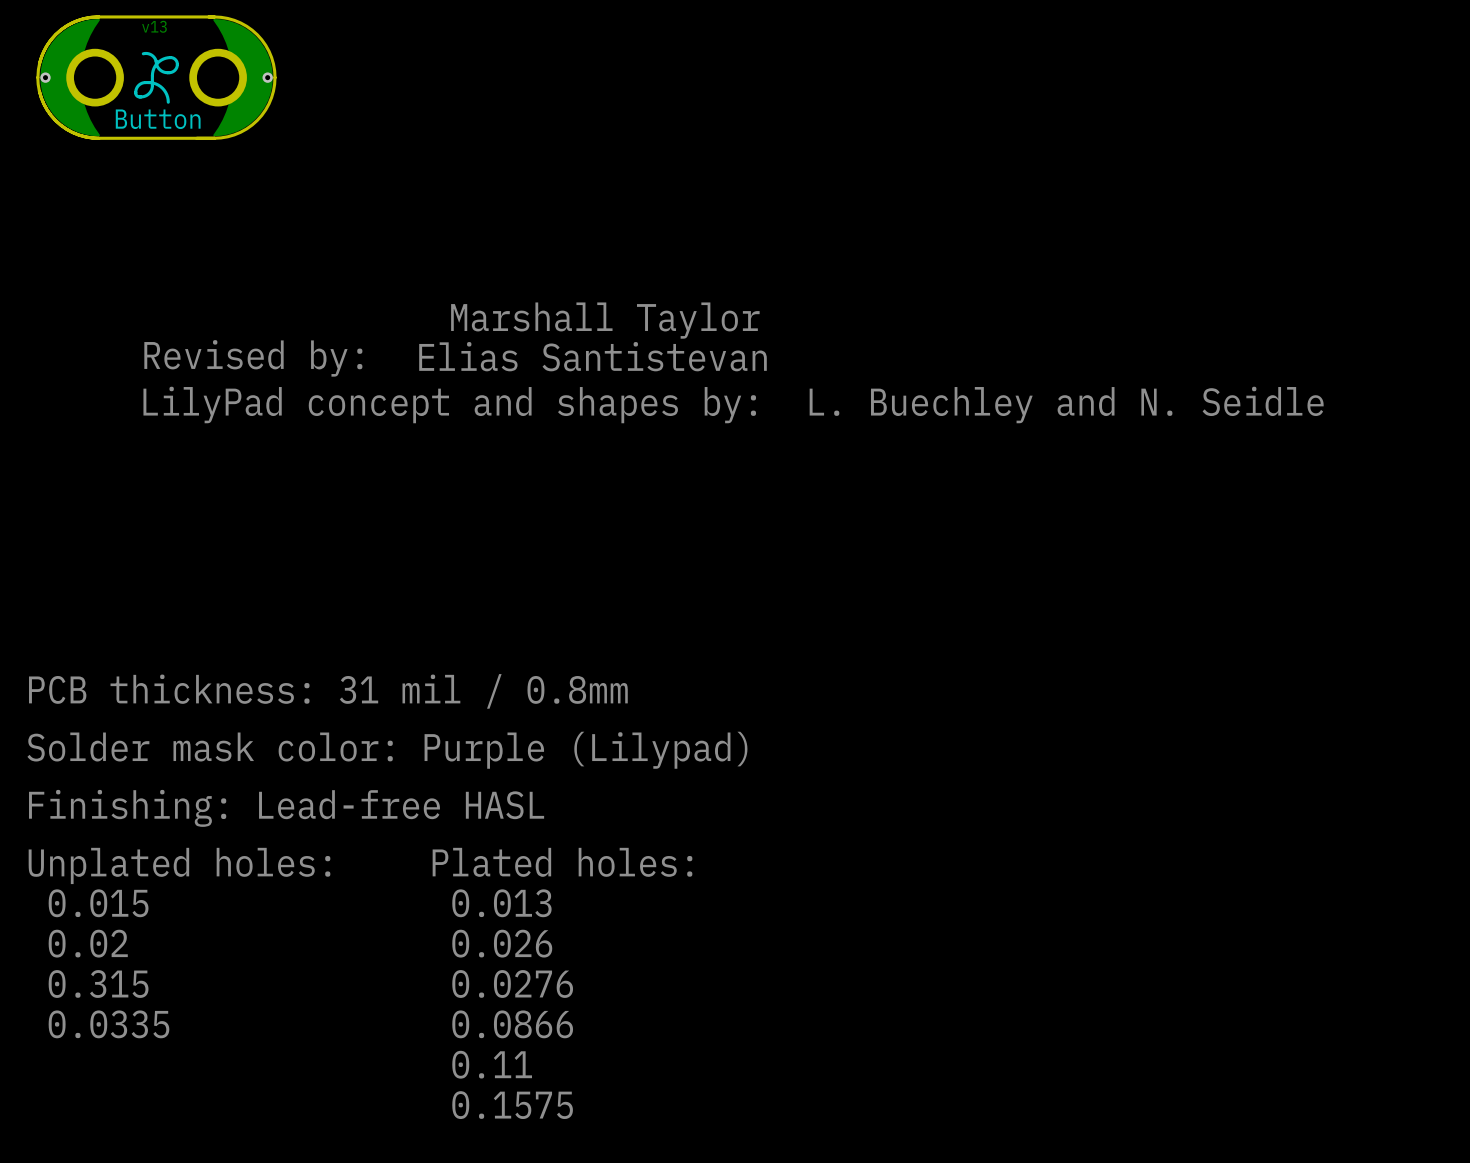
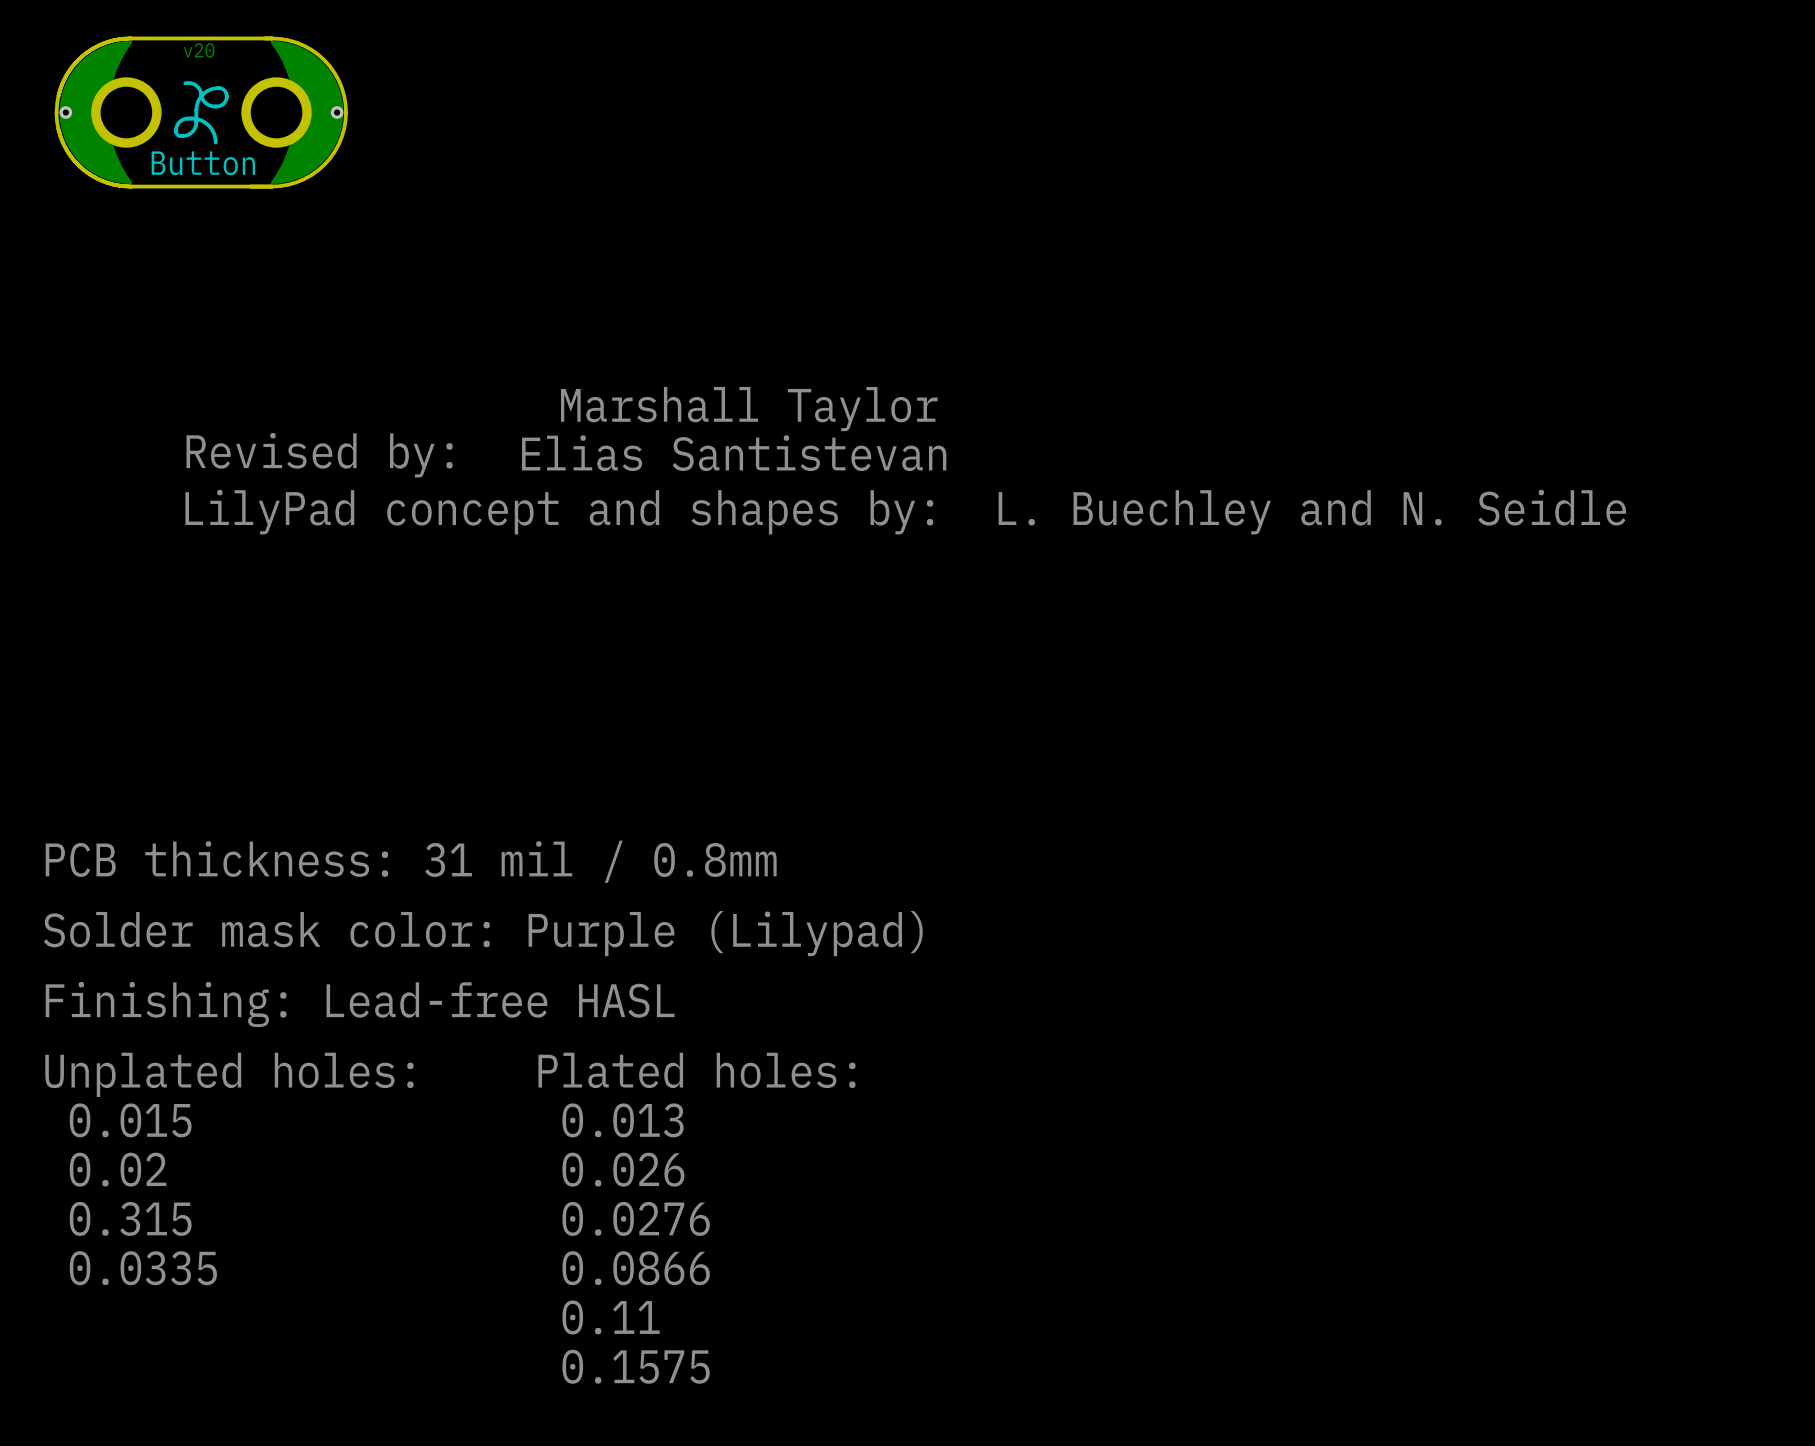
text: v13 (154, 26) -> v20 (199, 50)

